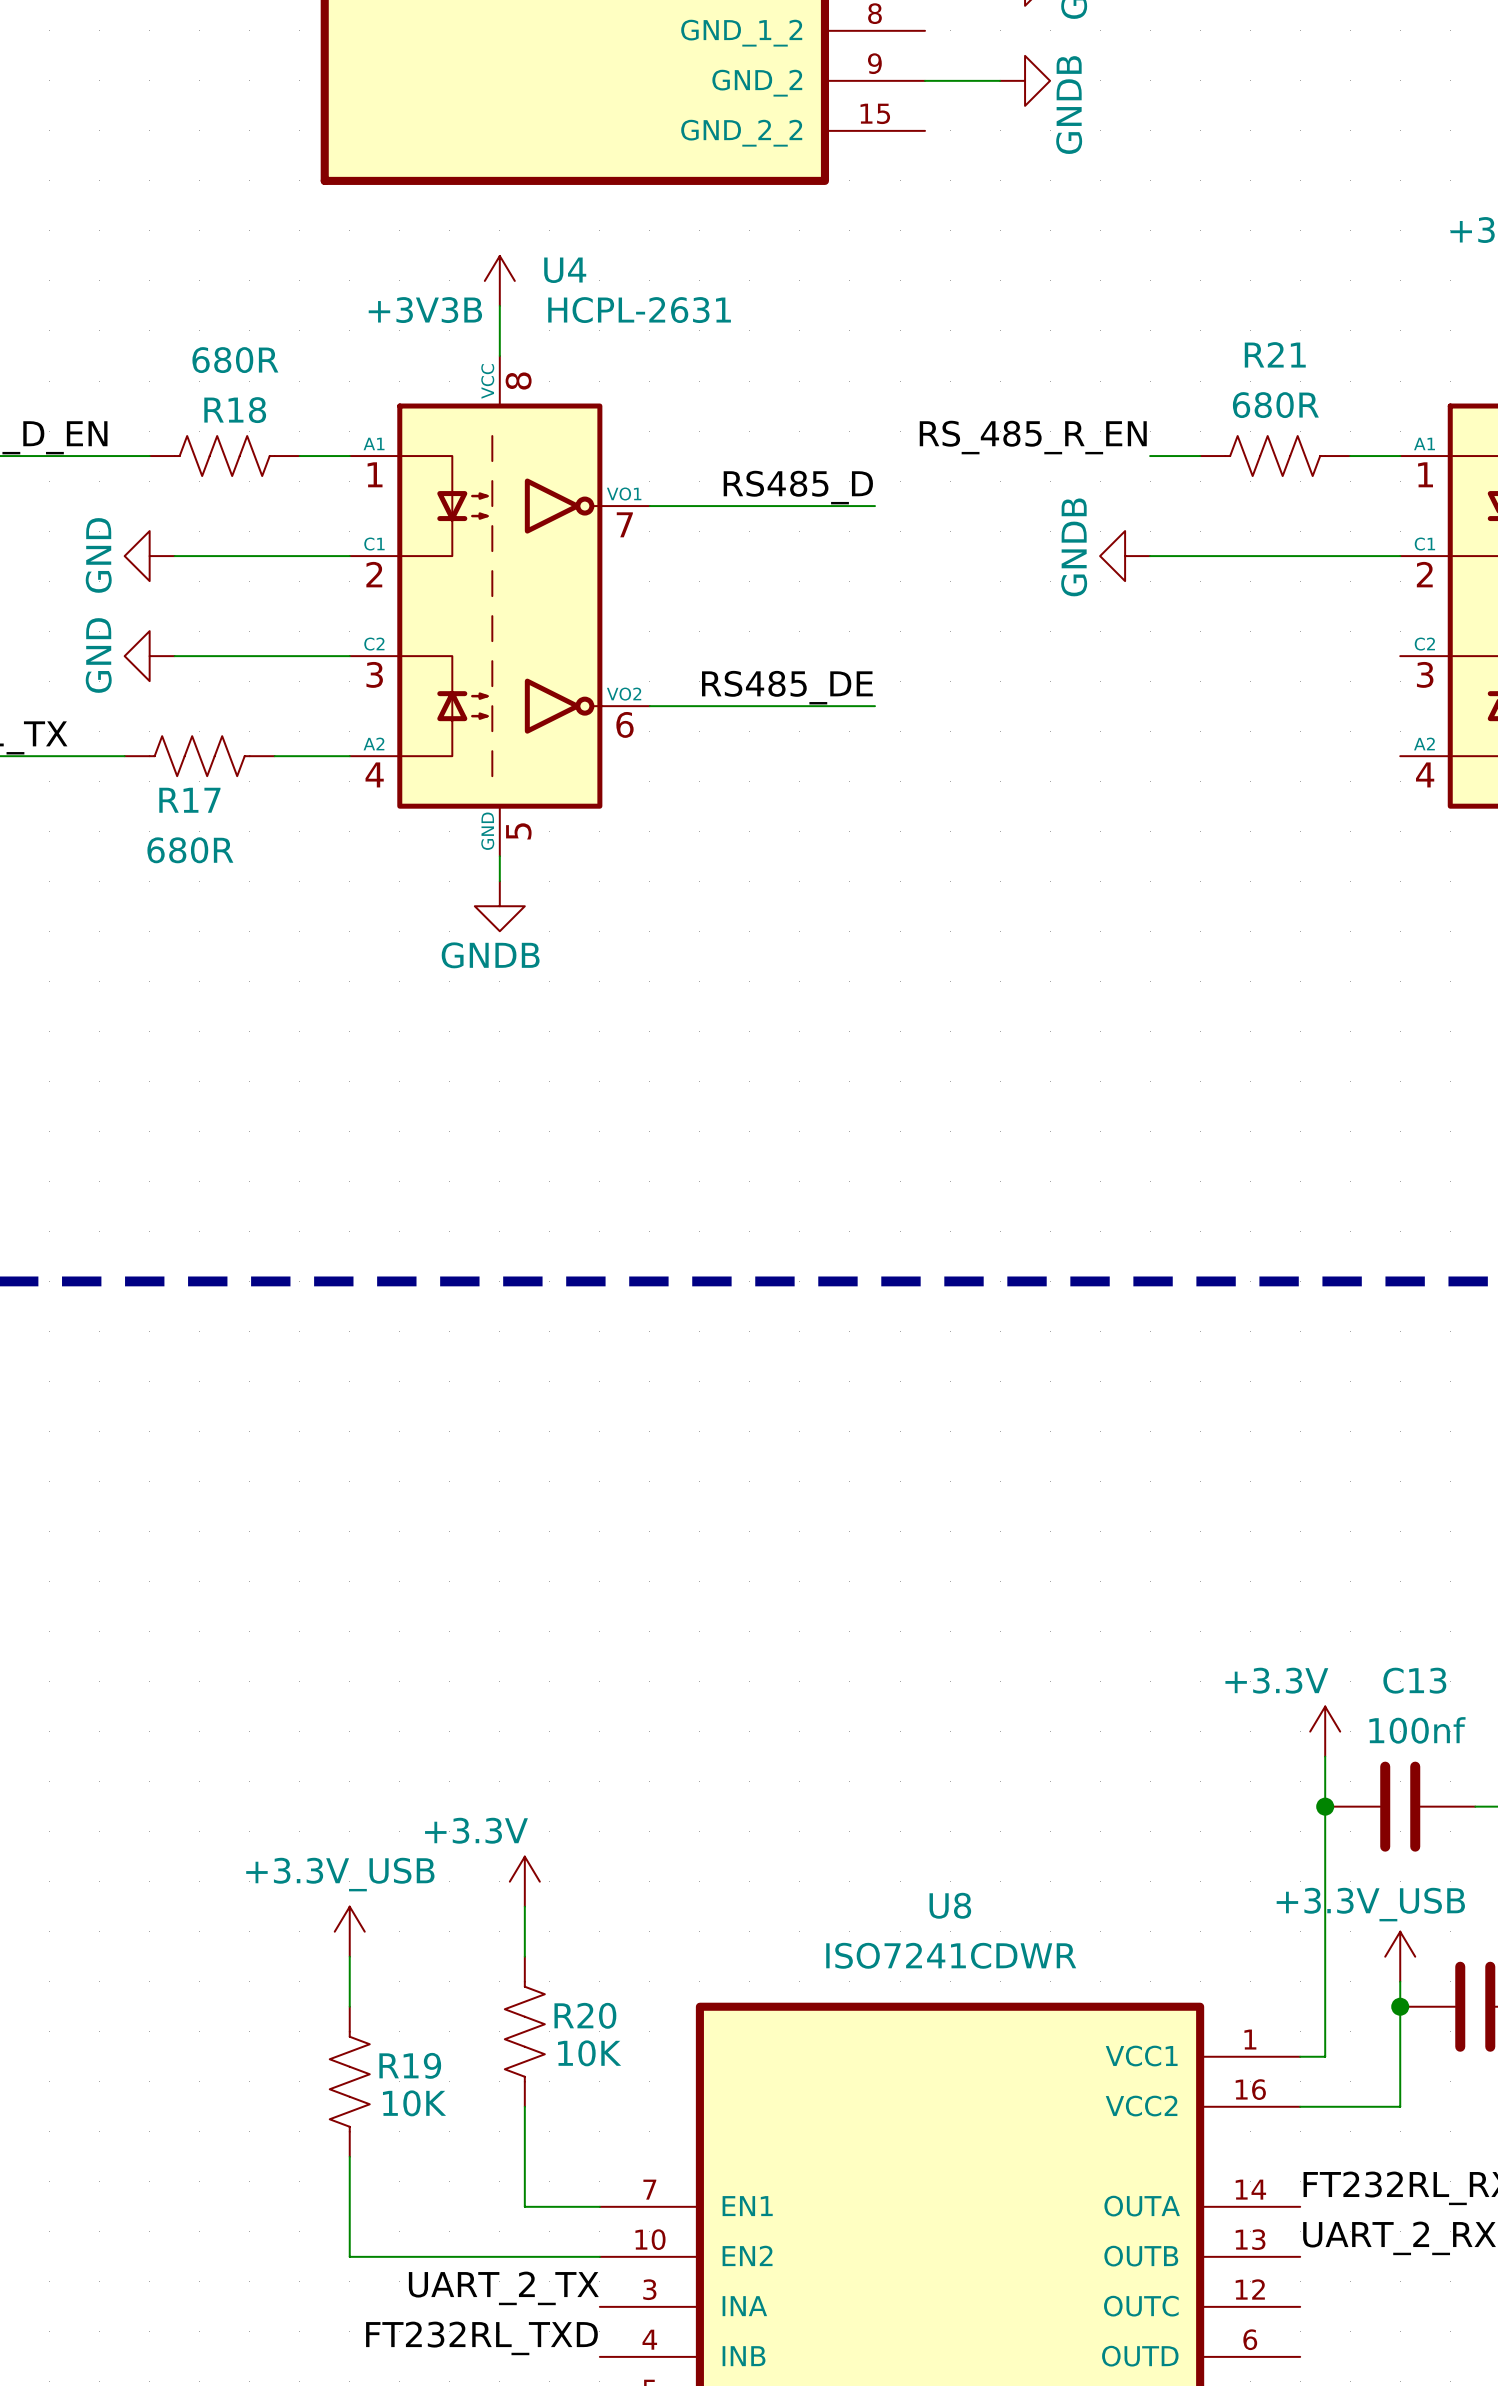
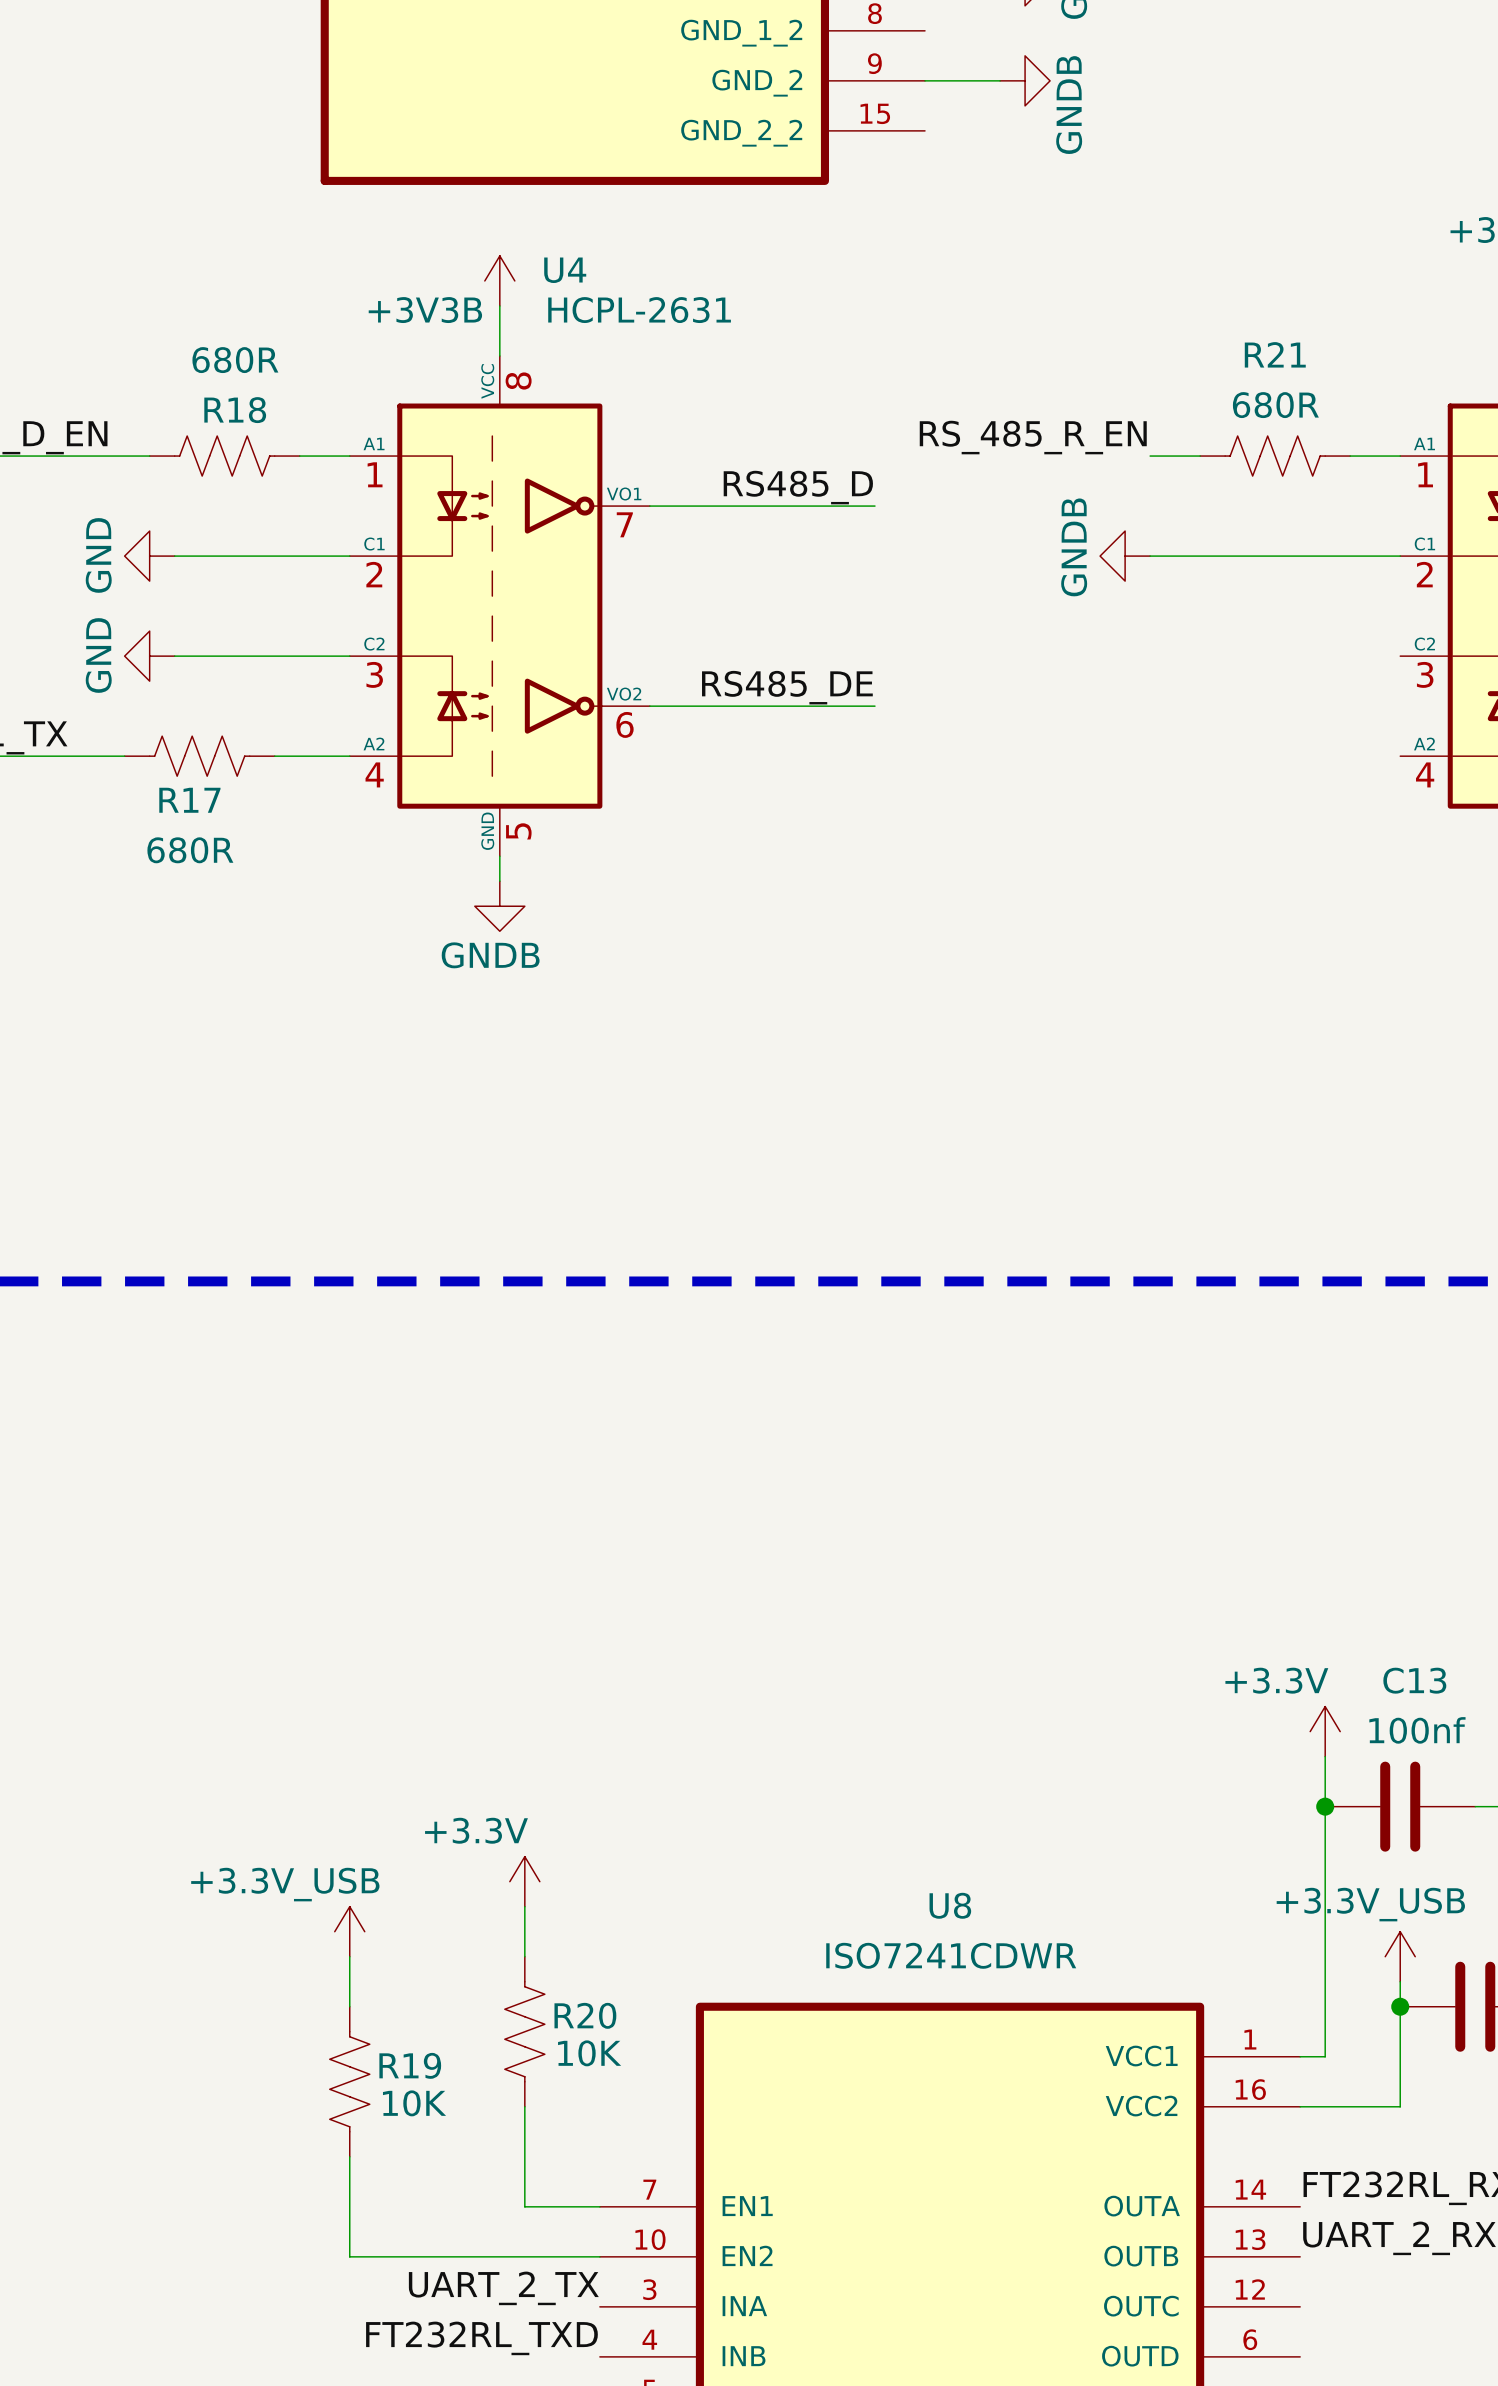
power symbol text position: +3.3V_USB (340, 1874) -> +3.3V_USB (285, 1884)

